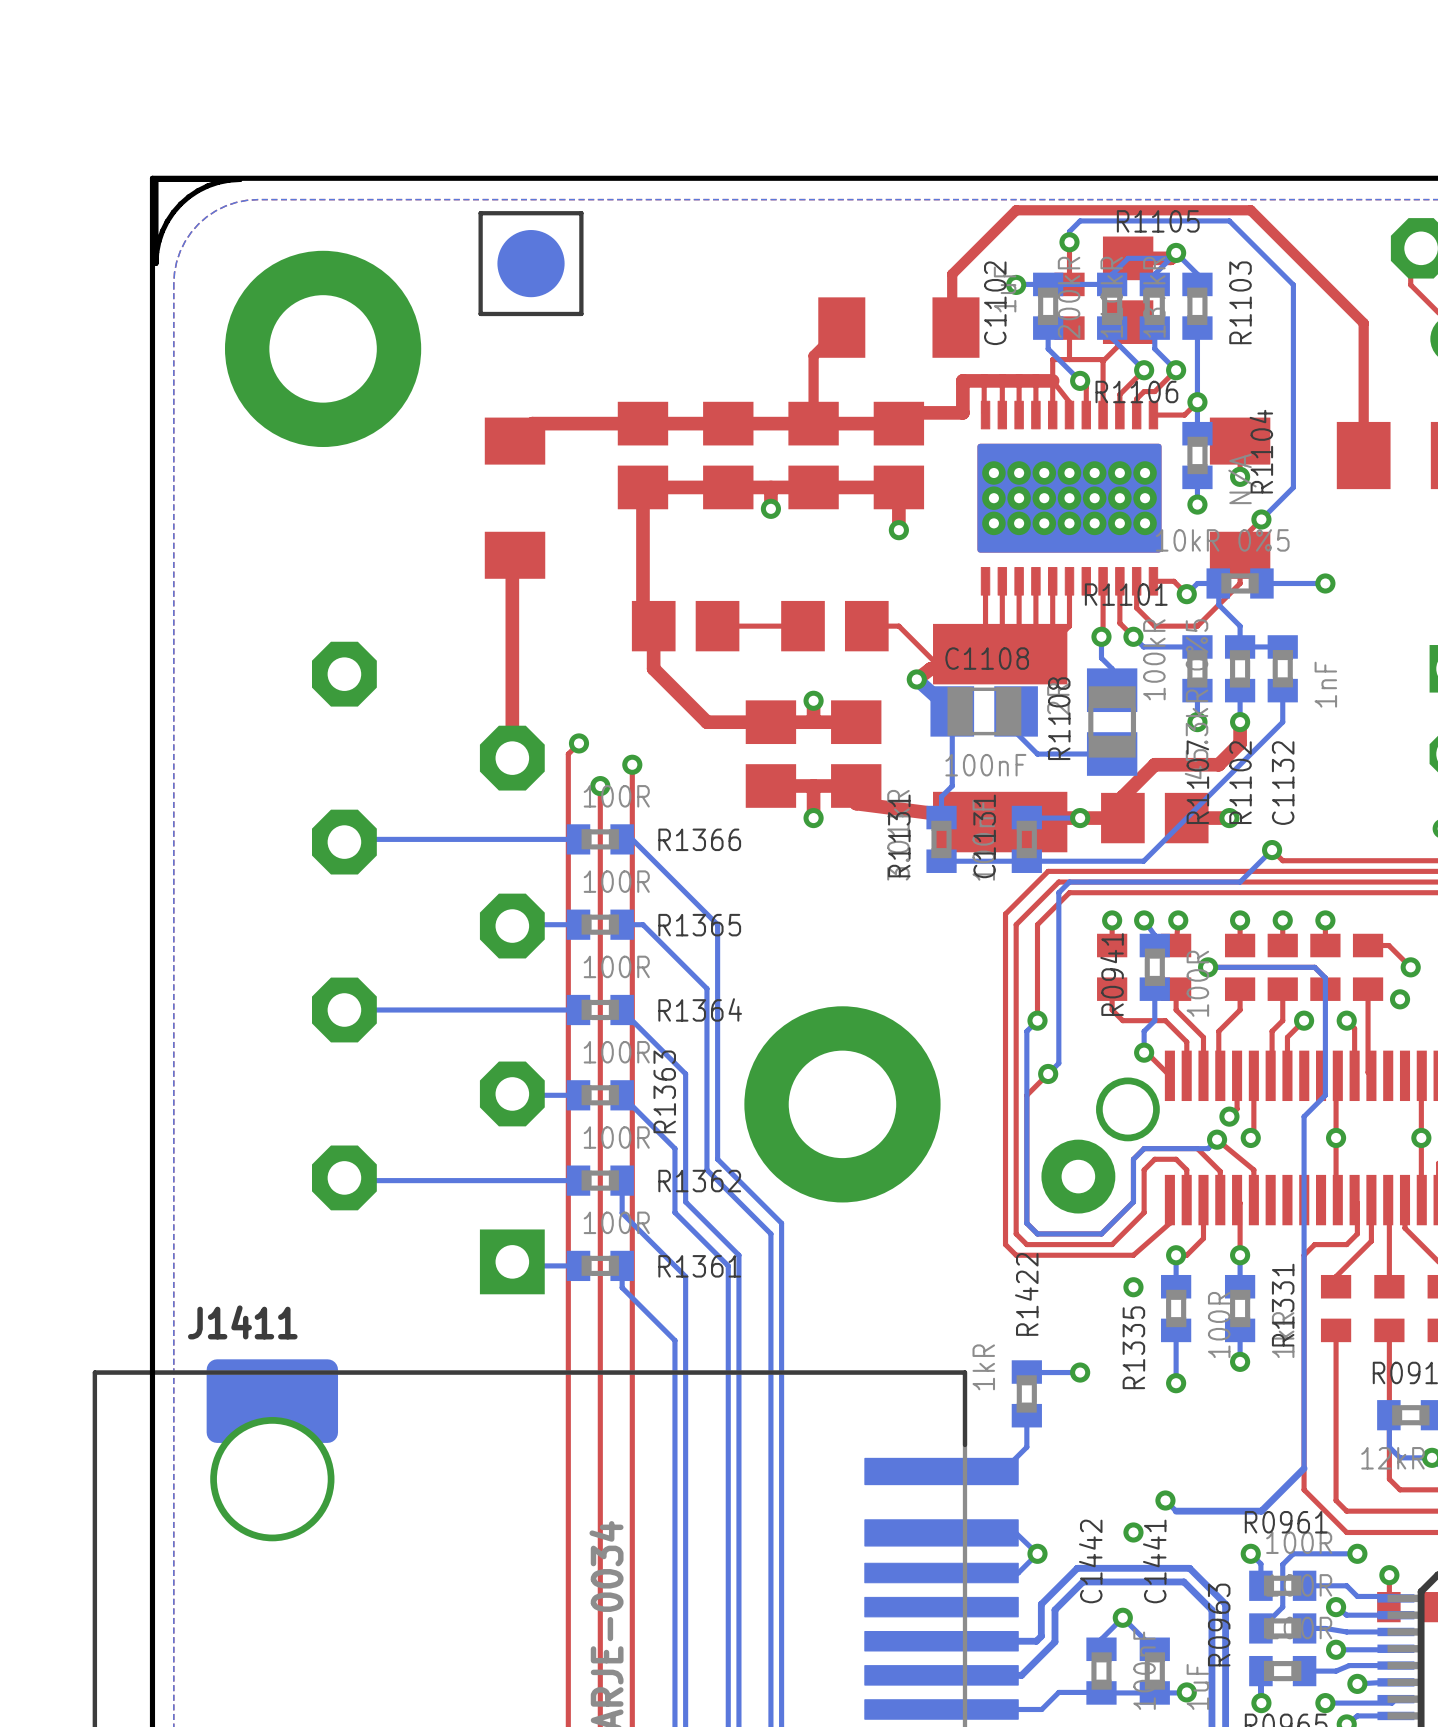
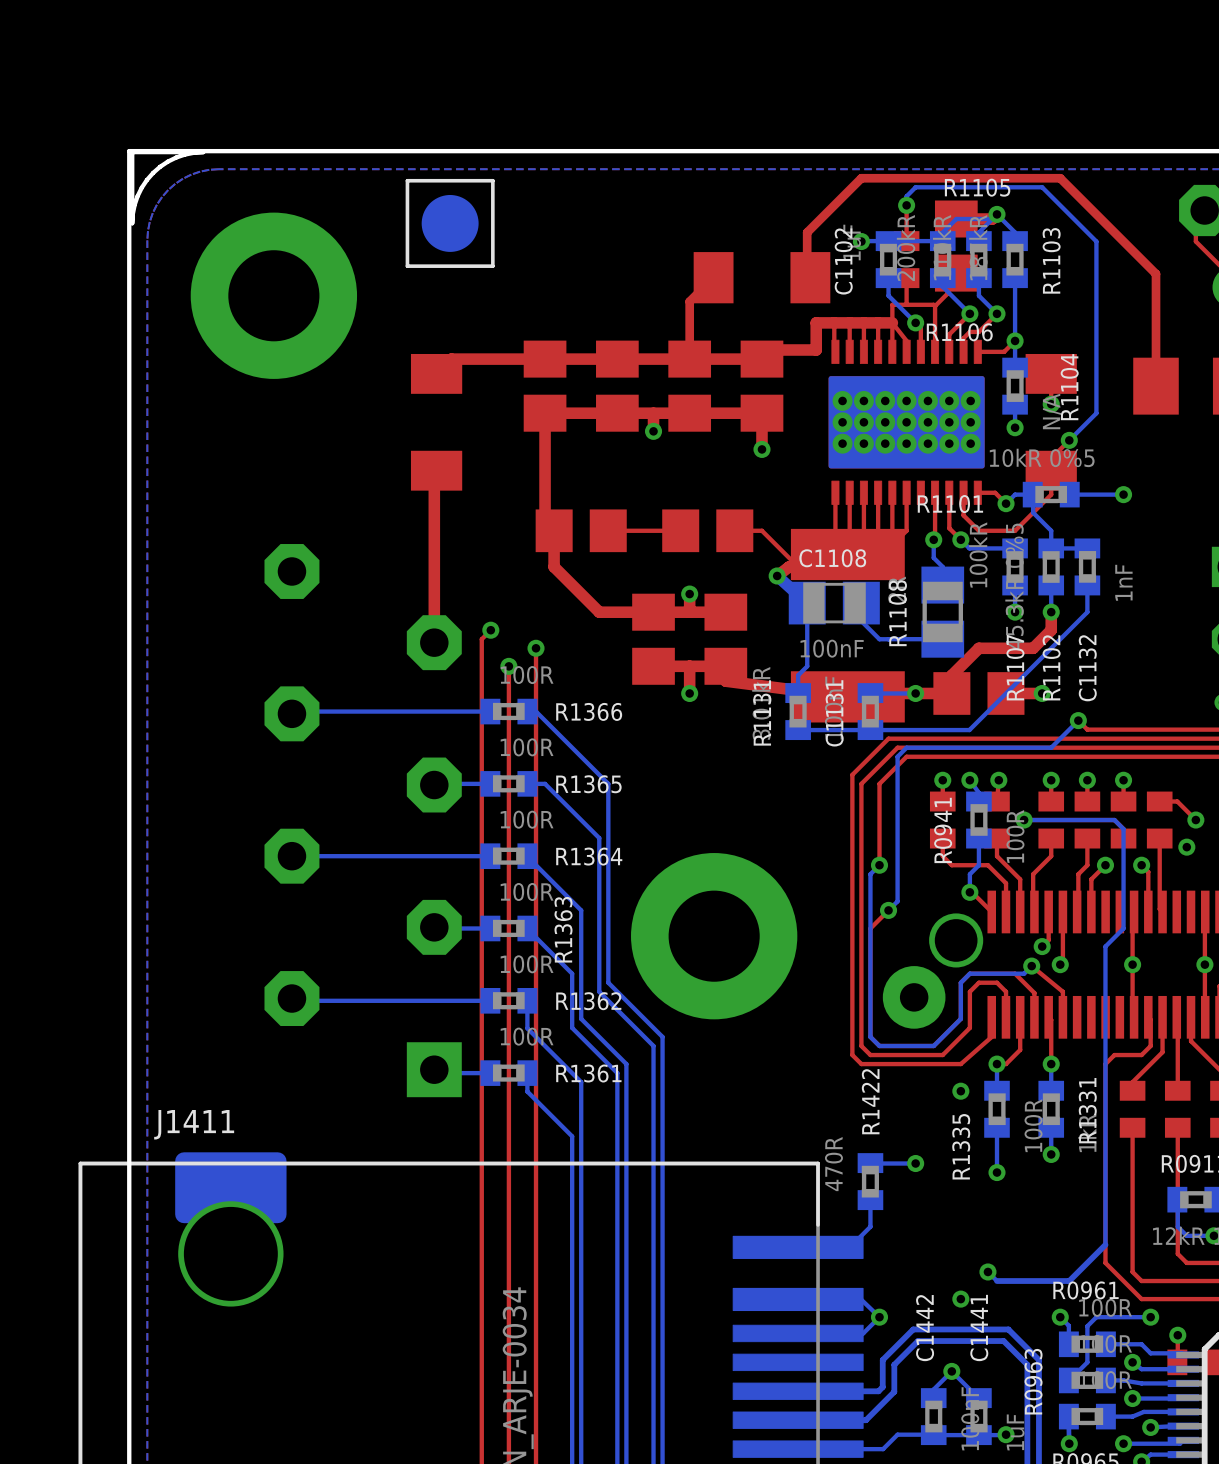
R1422 value: 1kR (983, 1367) -> 470R (833, 1164)

